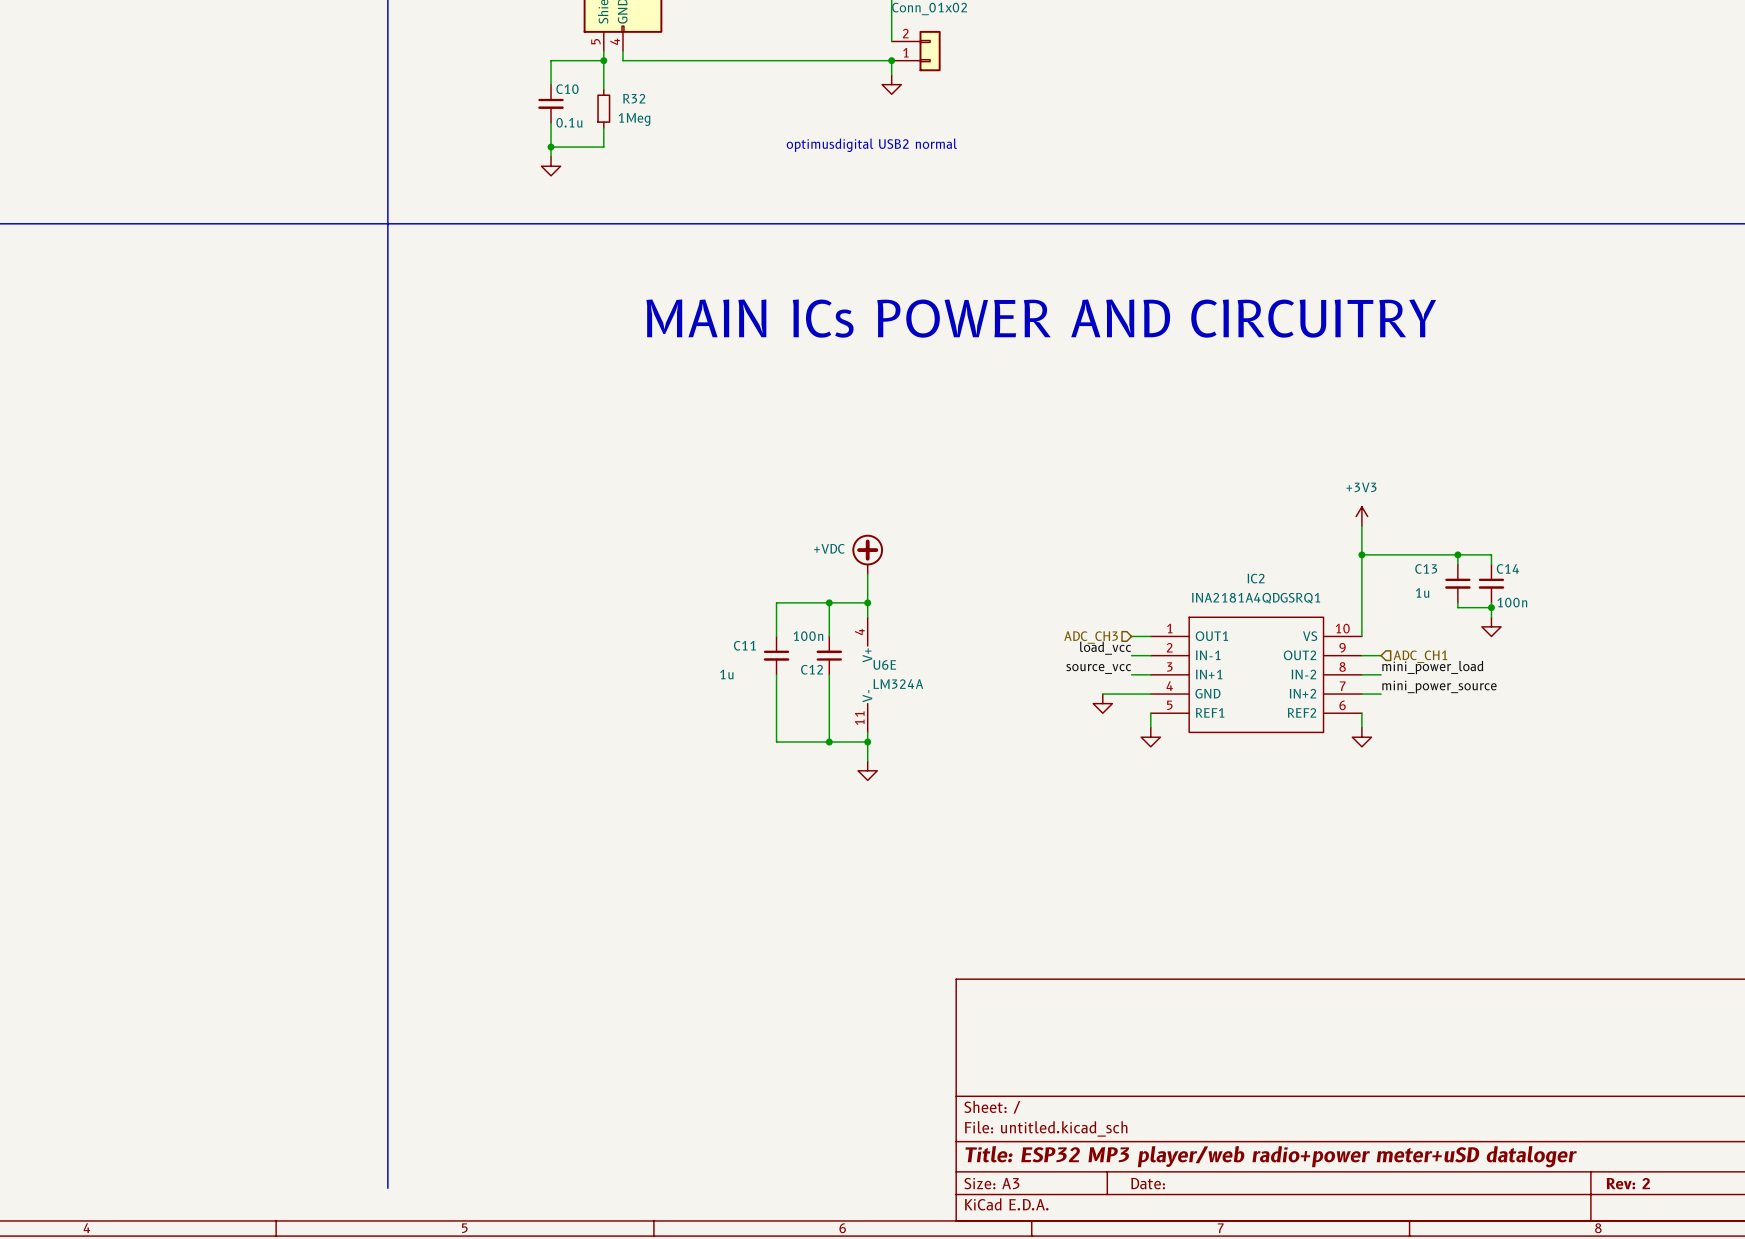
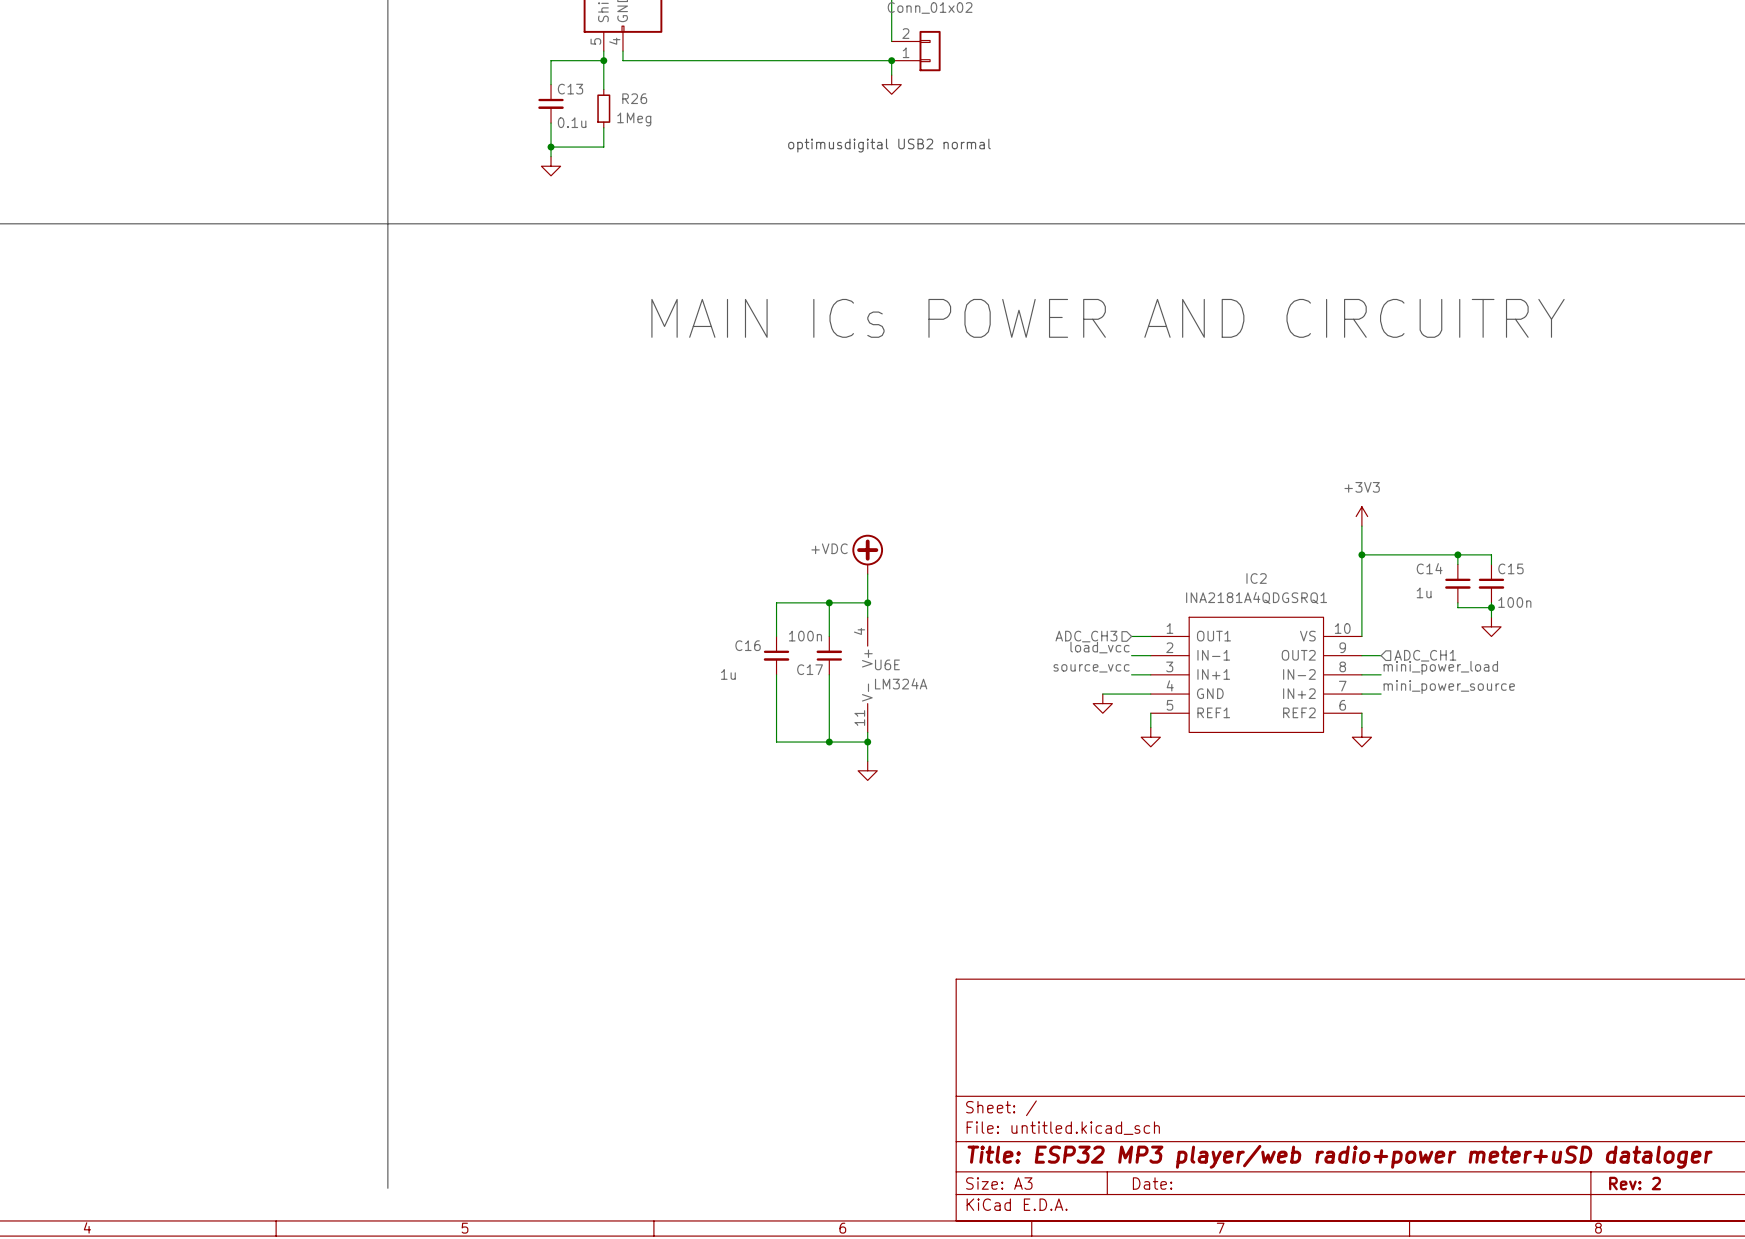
C10 name: C10 (567, 89) -> C13 (570, 89)
R32 name: R32 (634, 98) -> R26 (634, 98)
C13 name: C13 (1426, 568) -> C14 (1429, 568)
C14 name: C14 (1507, 568) -> C15 (1510, 568)
C11 name: C11 (744, 645) -> C16 (748, 645)
C12 name: C12 (812, 669) -> C17 (810, 669)

